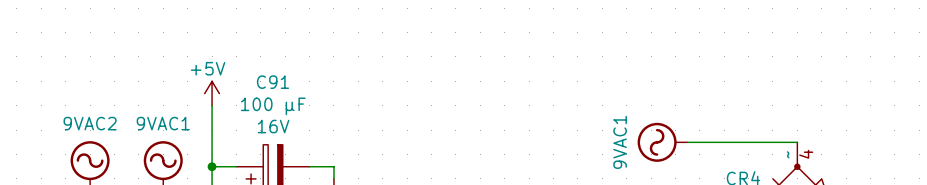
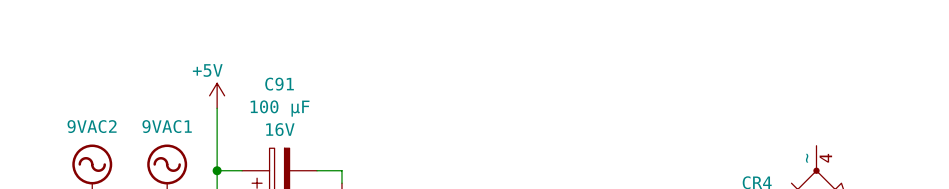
power symbol: 9VAC1 (662, 142) -> none
wire: (687, 142) (797, 142) -> none

